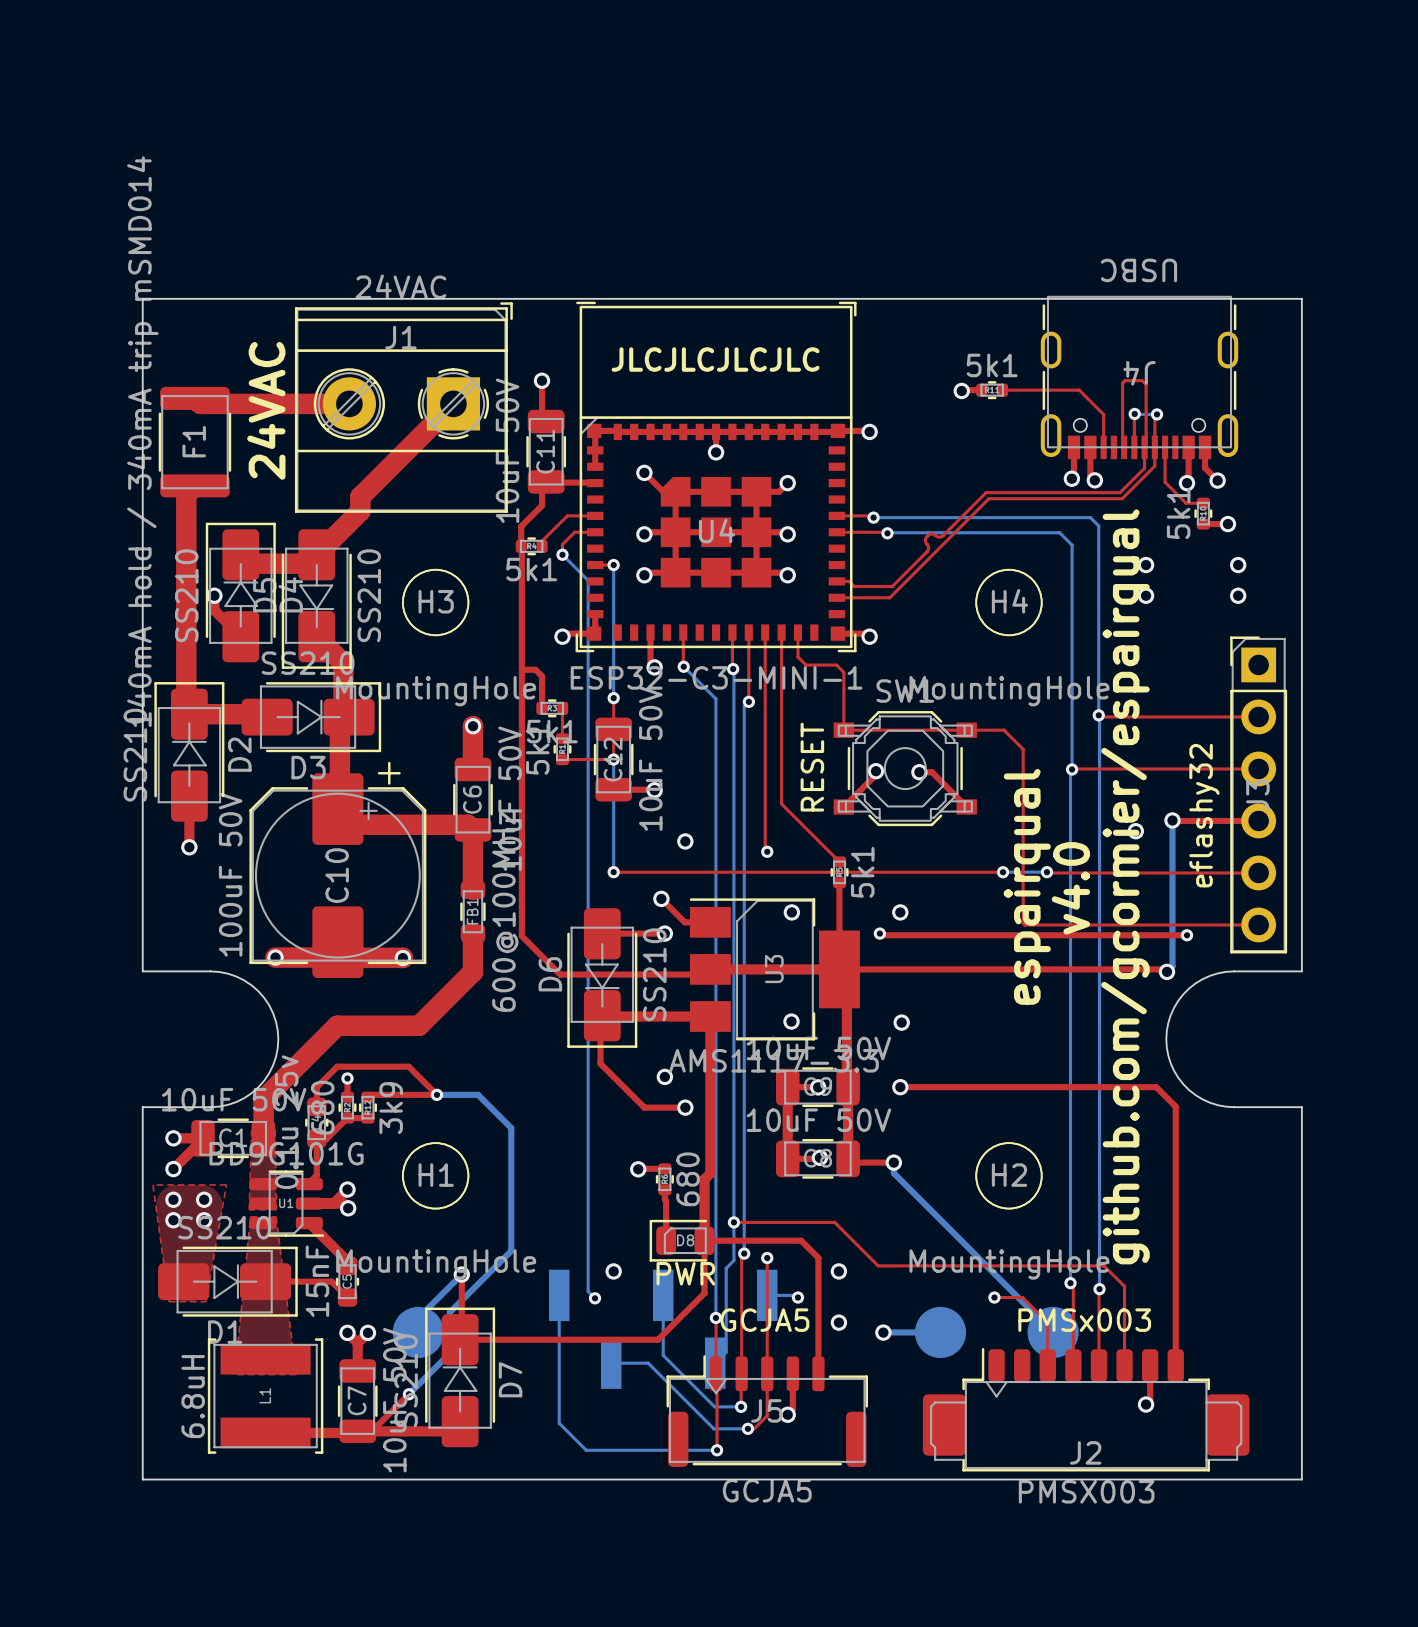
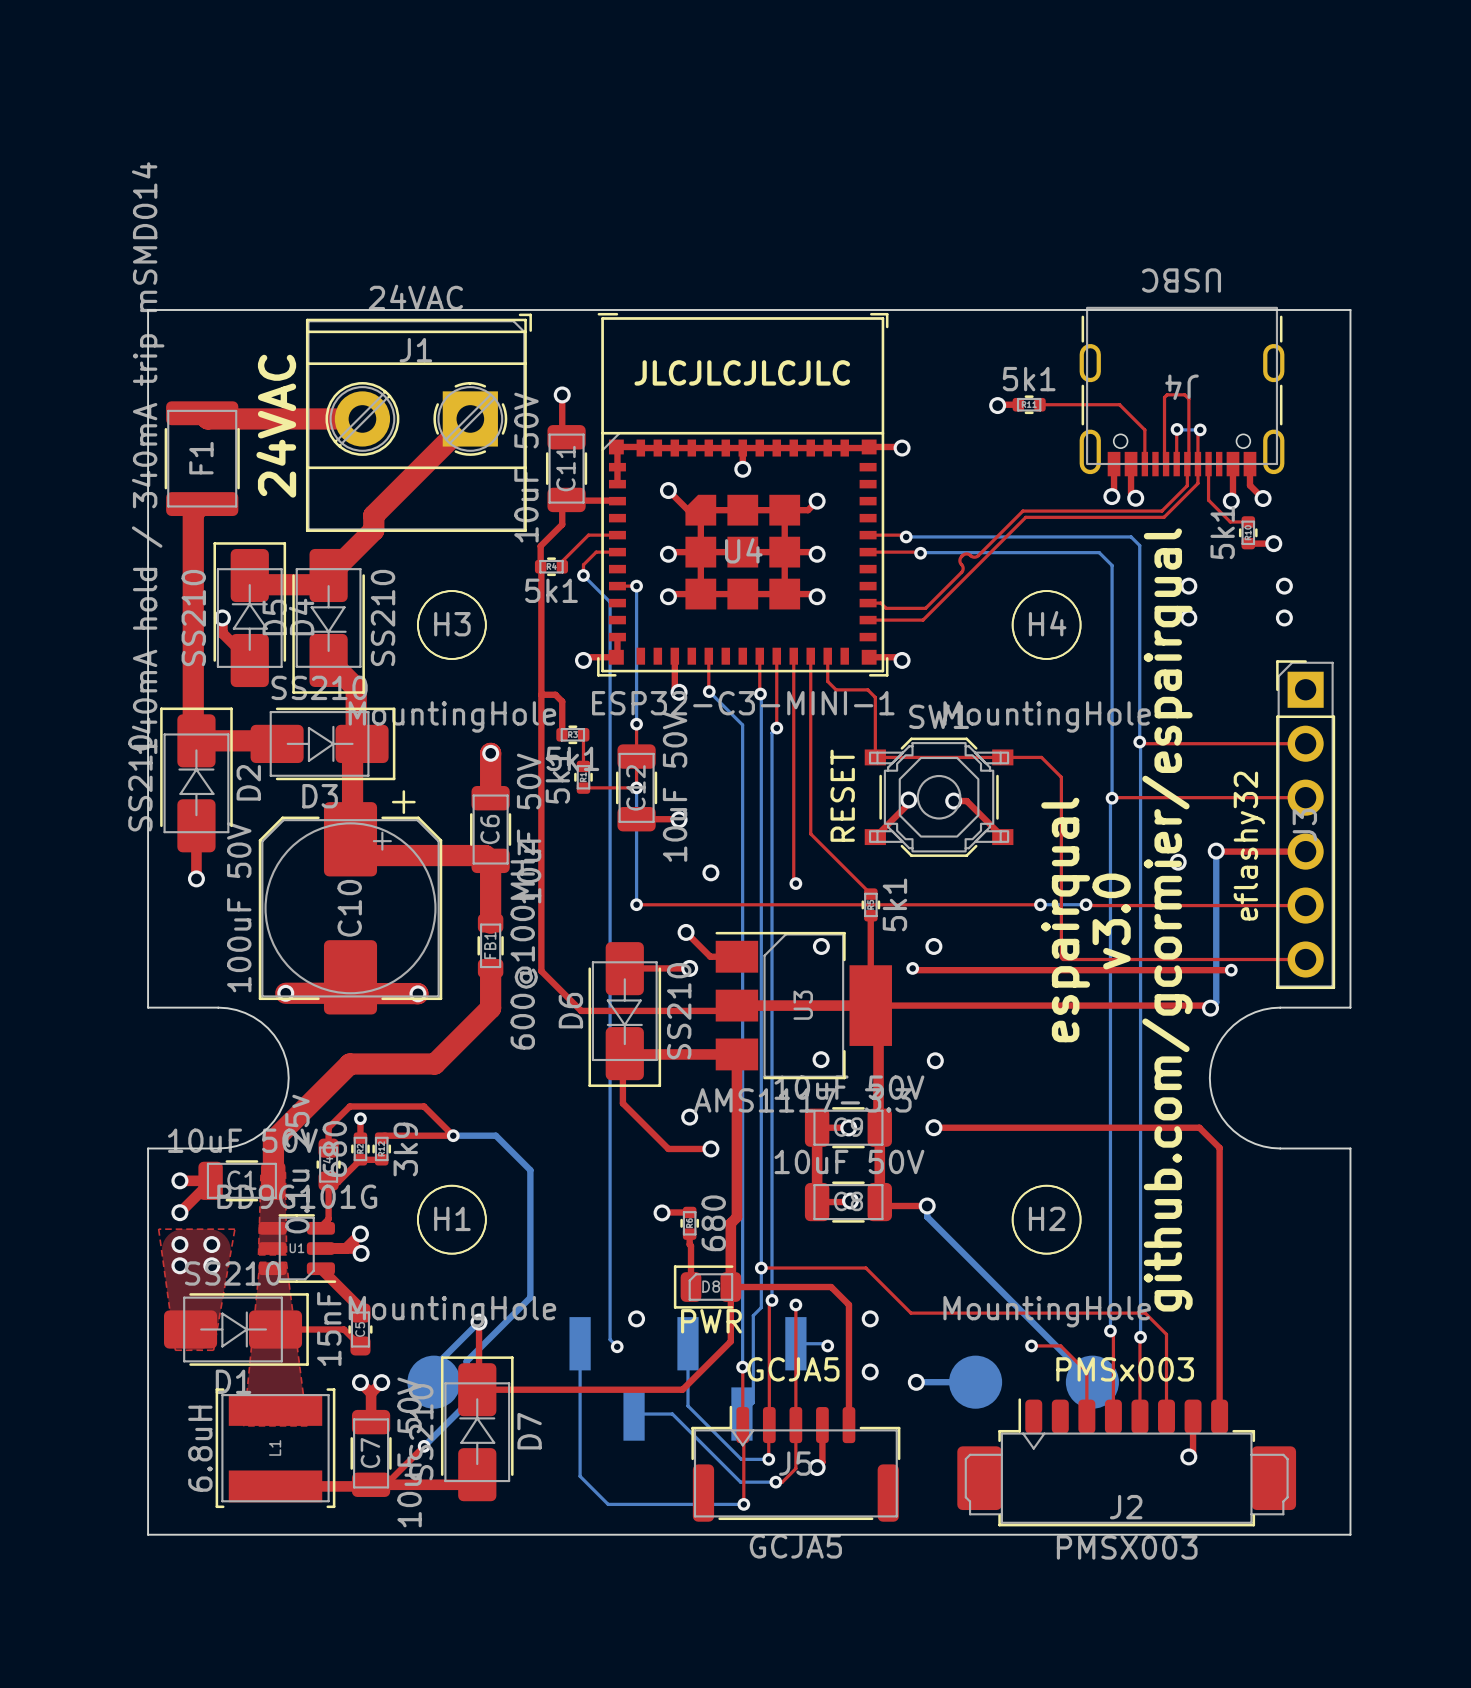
text: v4.0 (1070, 888) -> v3.0 (1111, 921)

